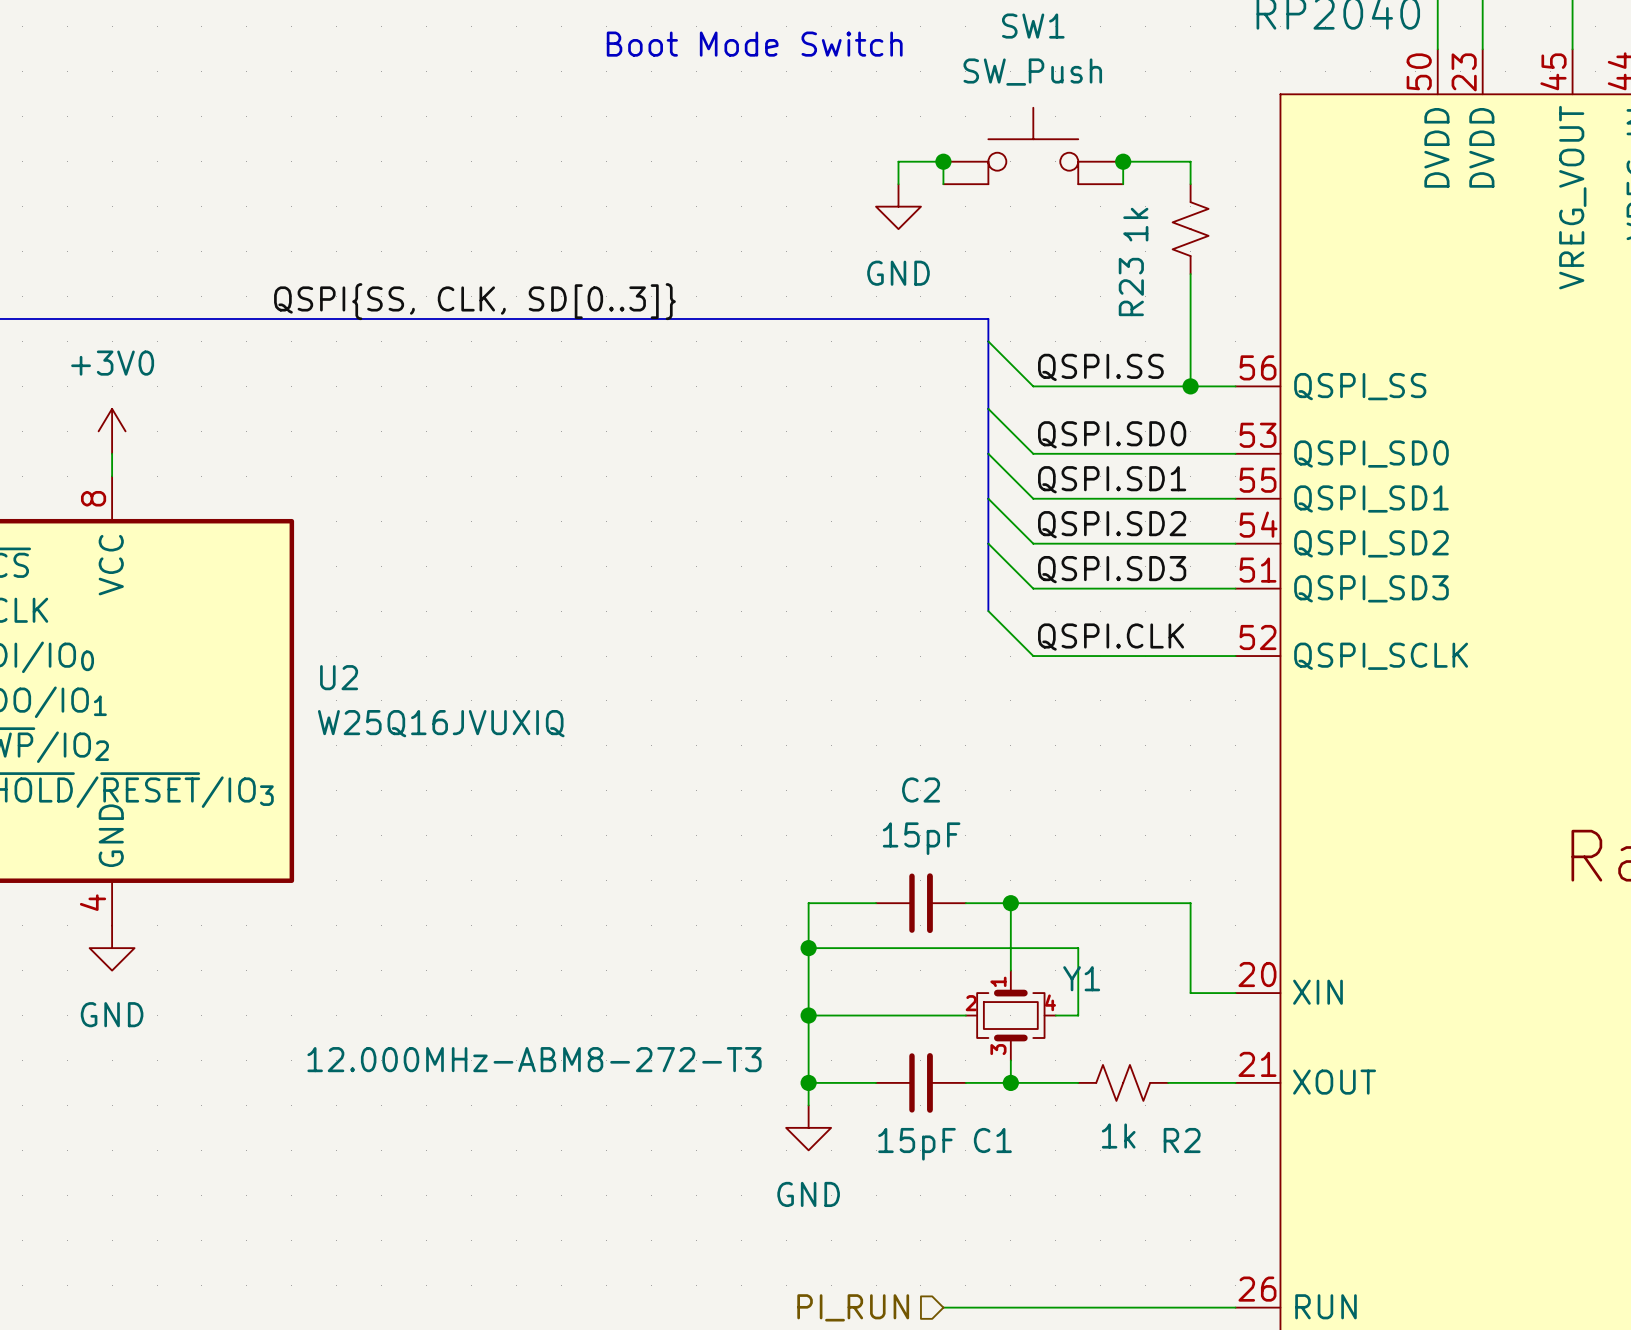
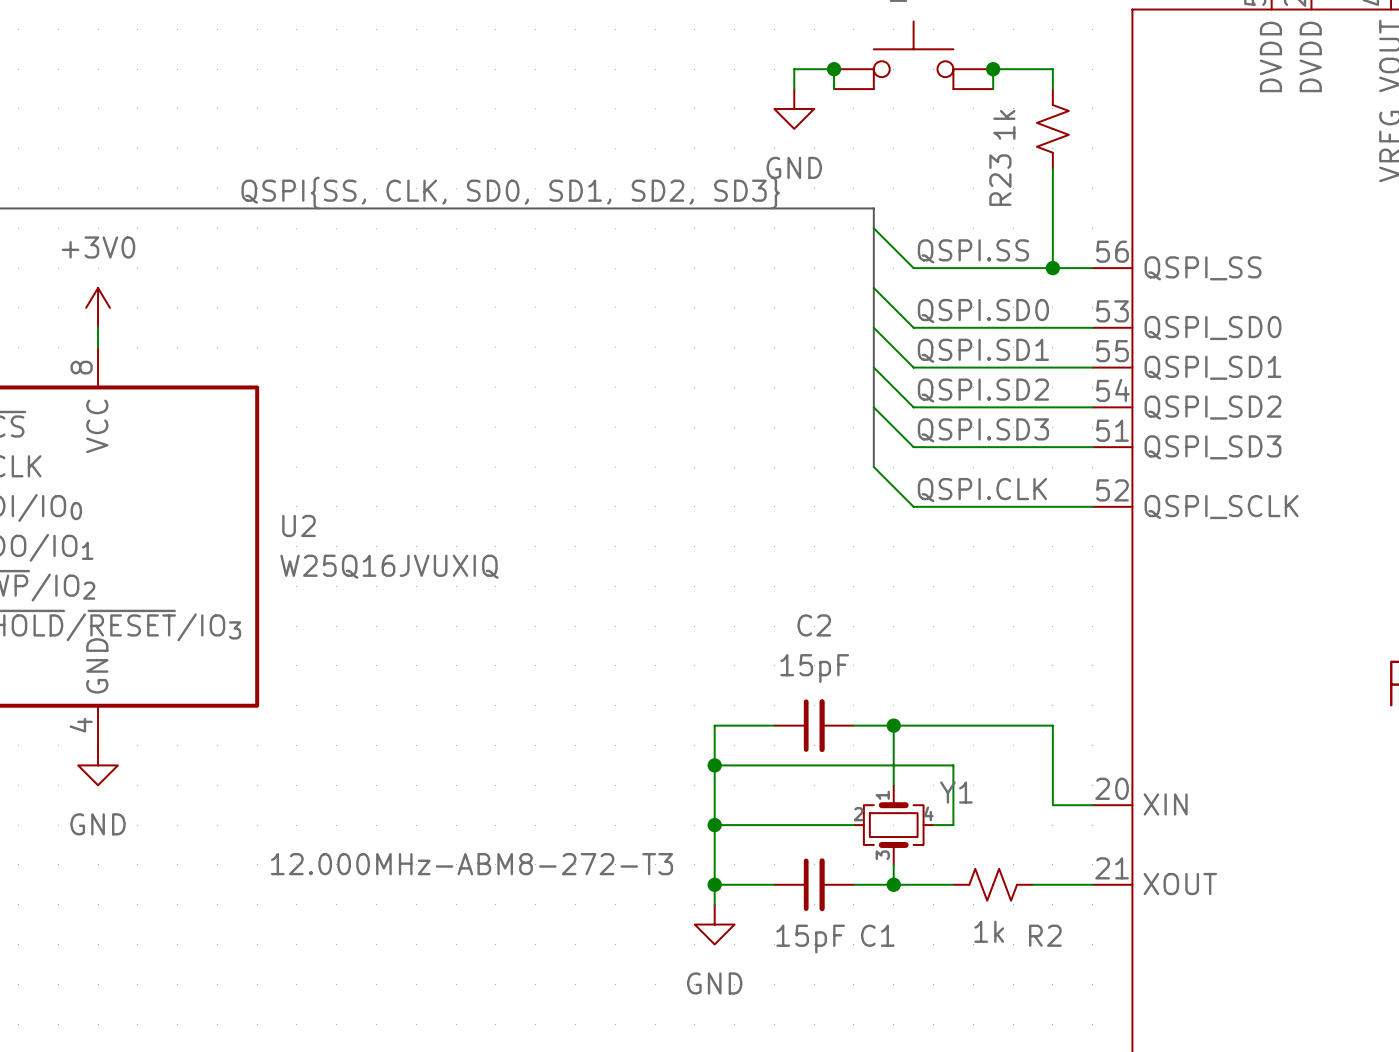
label: QSPI{SS, CLK, SD[0..3]} (474, 301) -> QSPI{SS, CLK, SD0, SD1, SD2, SD3} (510, 193)

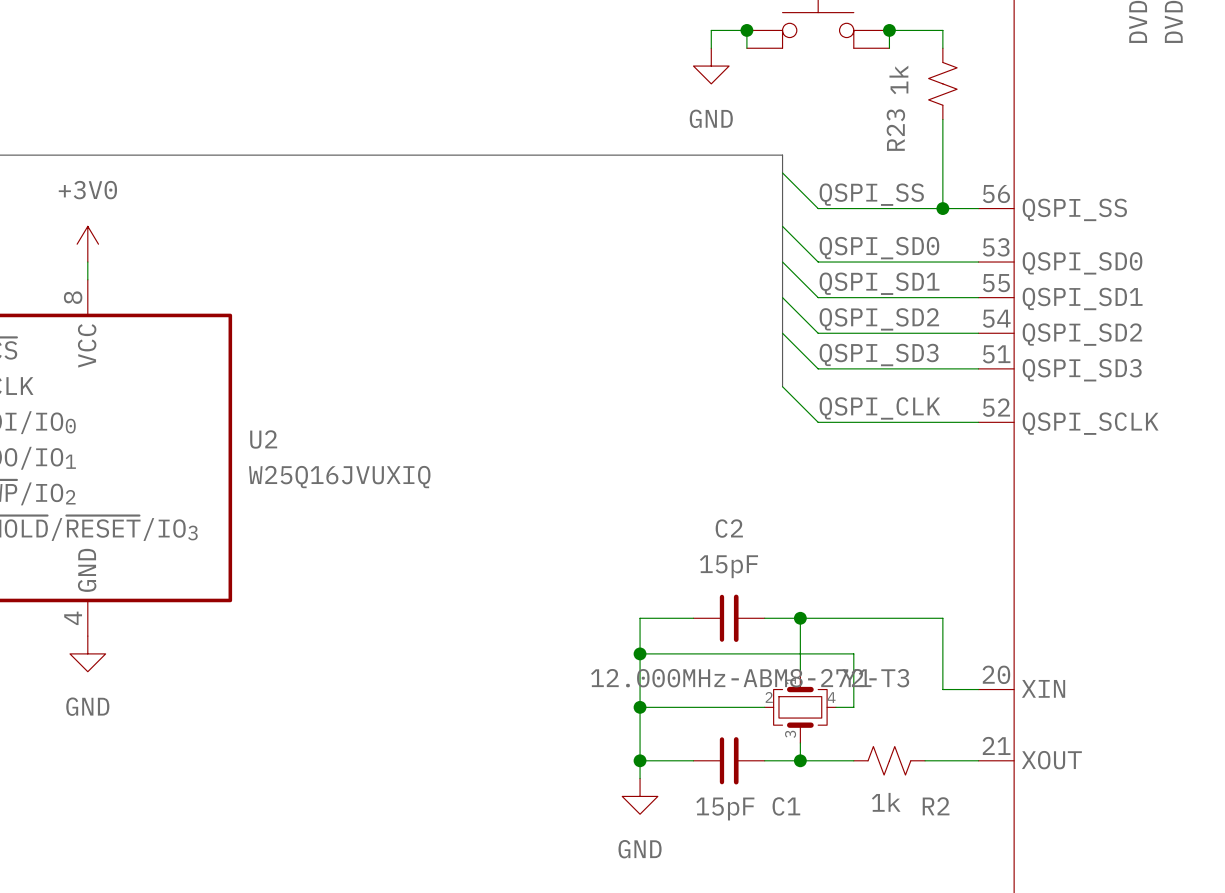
label: QSPI{SS, CLK, SD0, SD1, SD2, SD3} (510, 193) -> none
label: QSPI.SS (973, 251) -> QSPI_SS (871, 194)
label: QSPI.SD0 (983, 310) -> QSPI_SD0 (879, 248)
label: QSPI.SD1 (983, 350) -> QSPI_SD1 (879, 283)
label: QSPI.SD2 (983, 390) -> QSPI_SD2 (879, 319)
label: QSPI.SD3 (983, 430) -> QSPI_SD3 (879, 355)
label: QSPI.CLK (982, 490) -> QSPI_CLK (879, 408)
Y1 value position: 12.000MHz-ABM8-272-T3 (472, 864) -> 12.000MHz-ABM8-272-T3 (750, 678)

